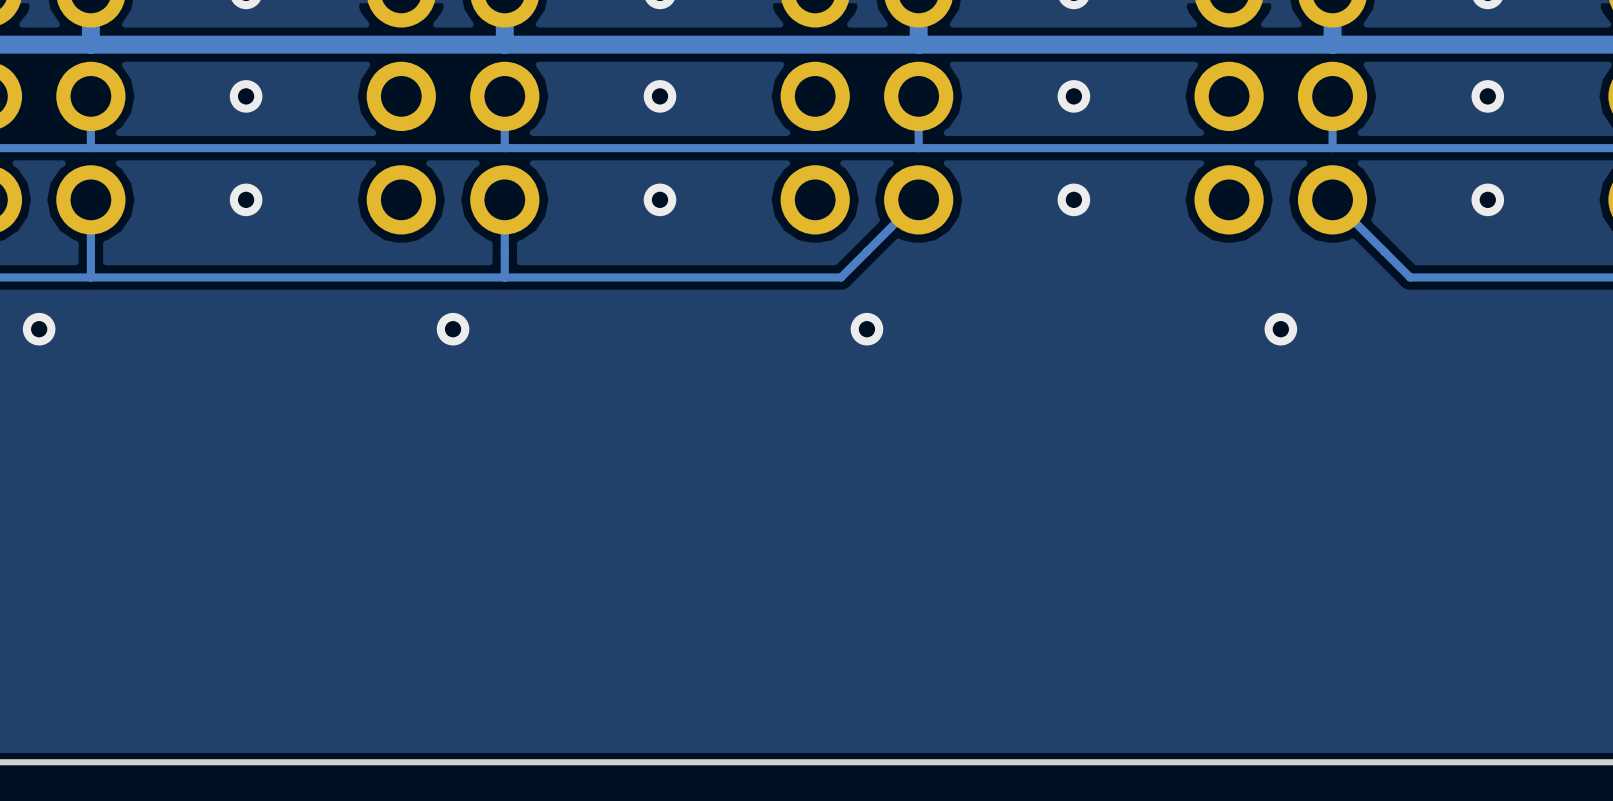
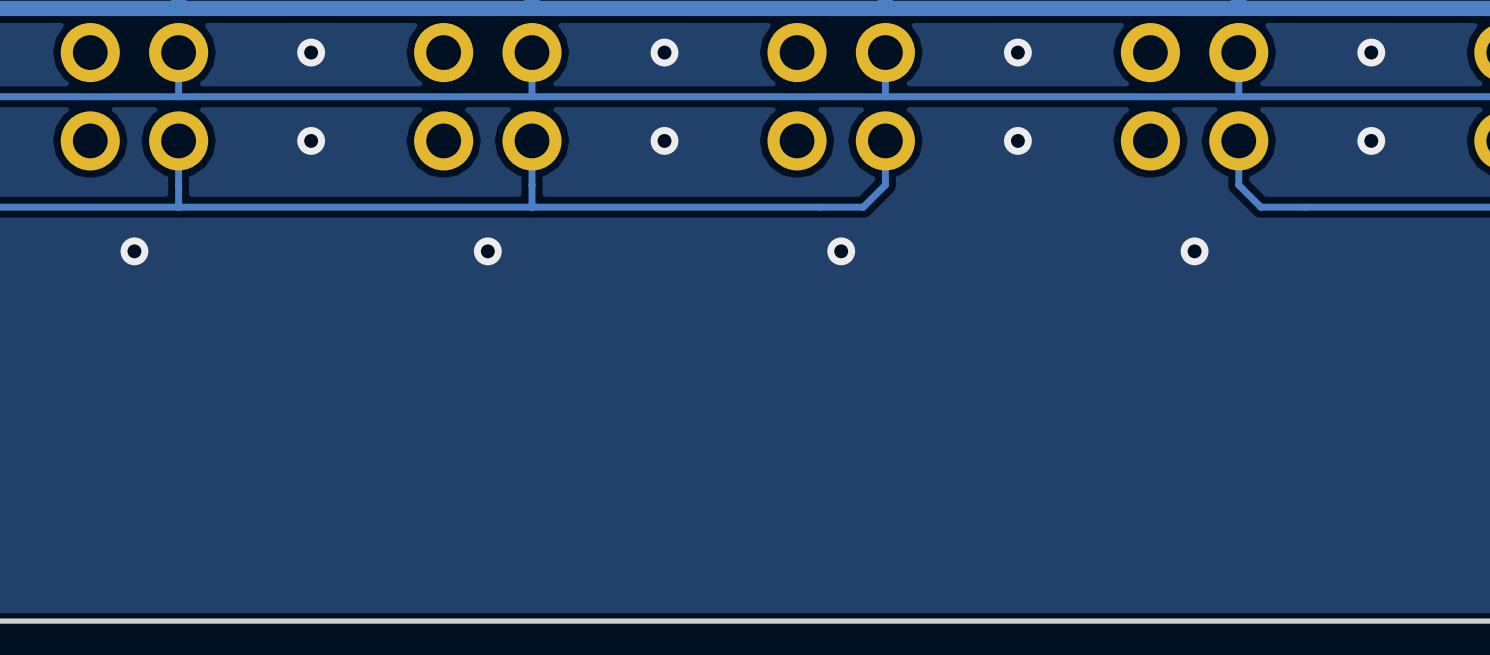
track: (918, 199) (841, 277) -> (885, 140) (885, 185) (863, 207) (819, 207)
track: (1332, 199) (1410, 277) -> (1238, 140) (1238, 185) (1260, 207) (1305, 207)

